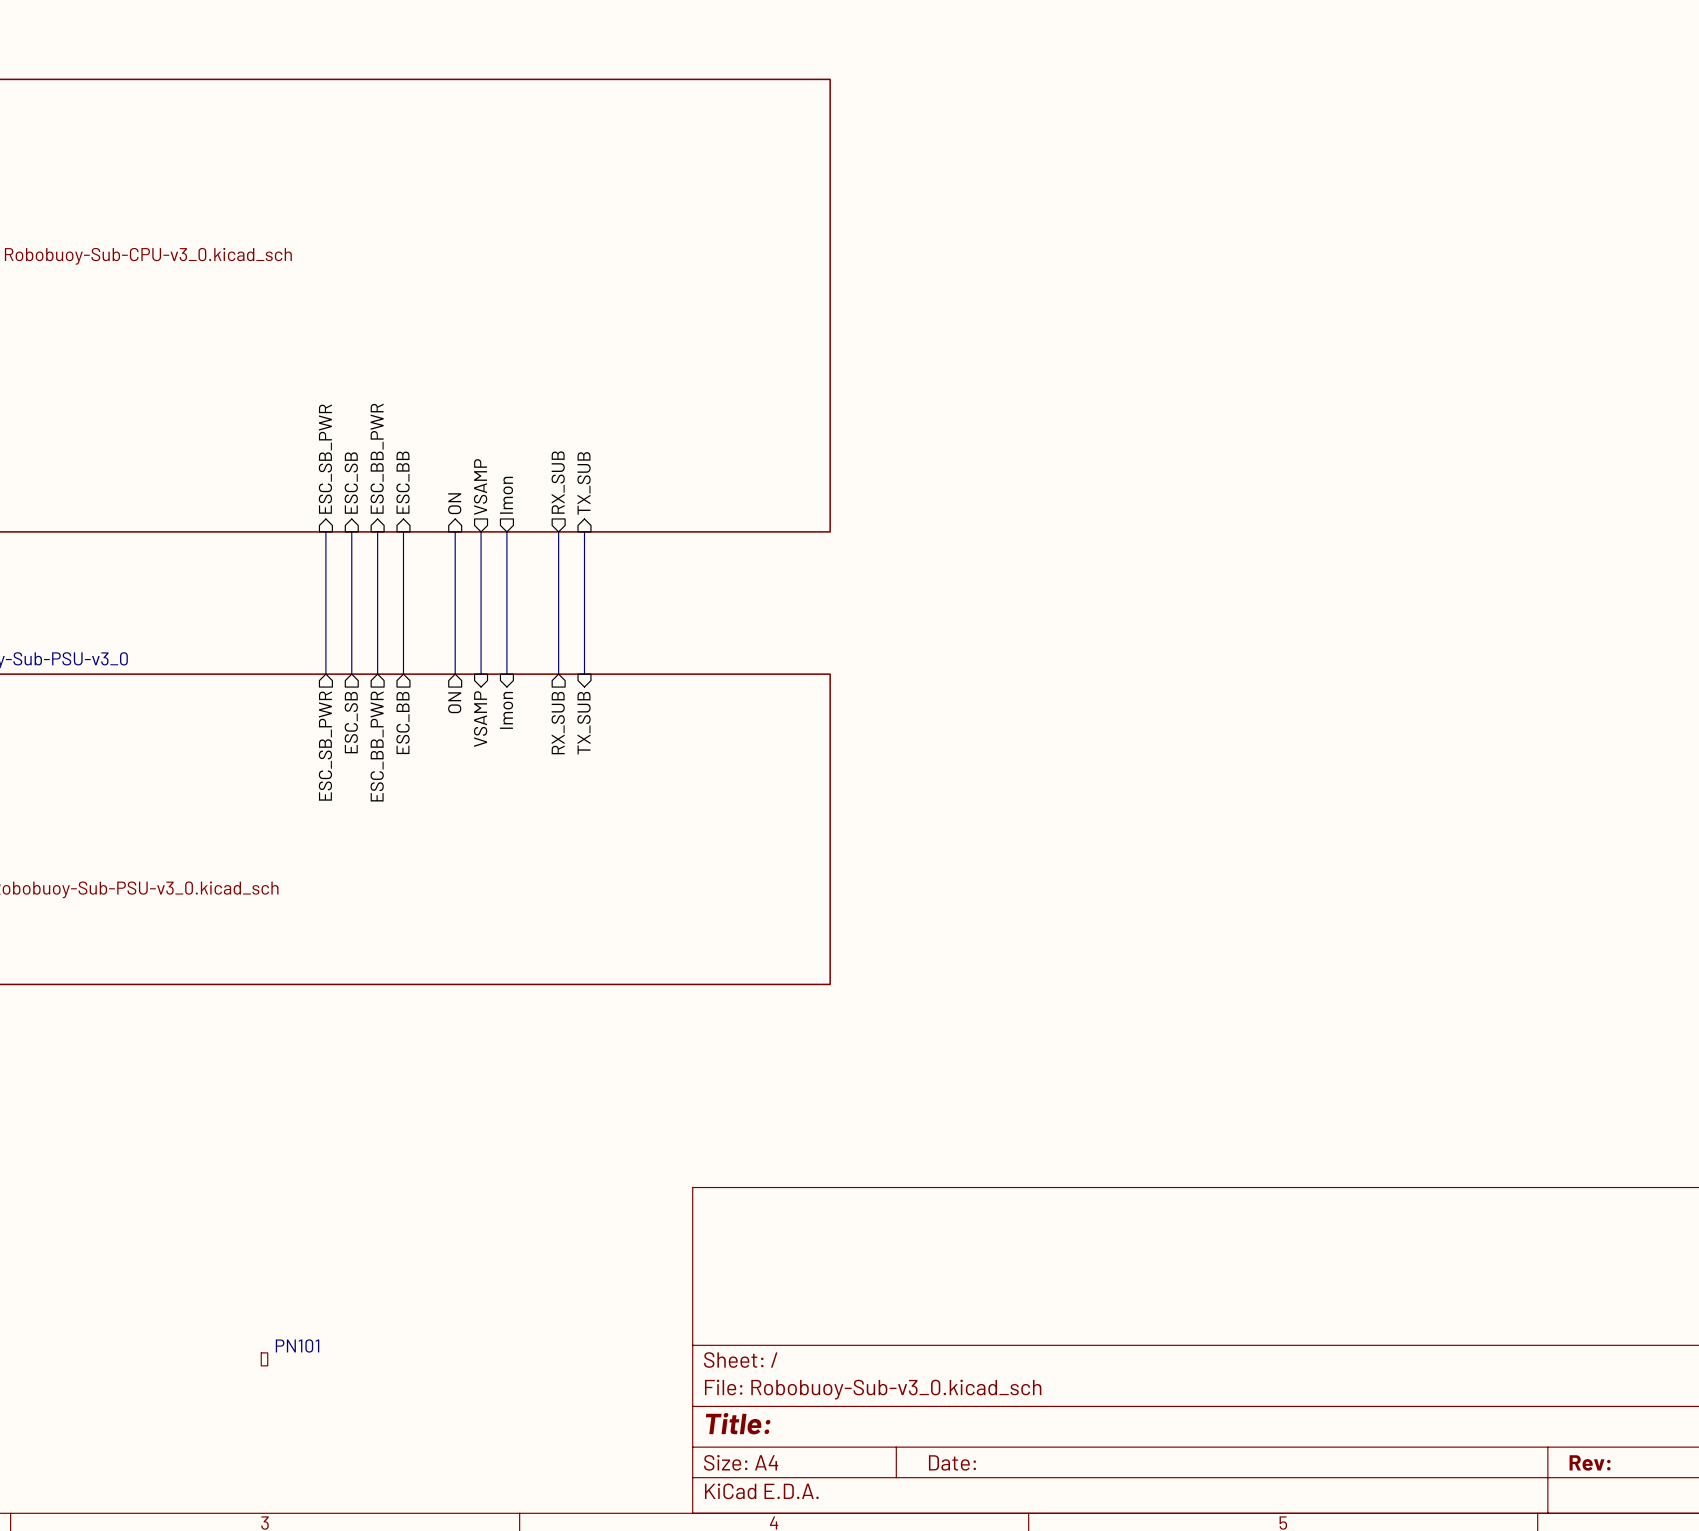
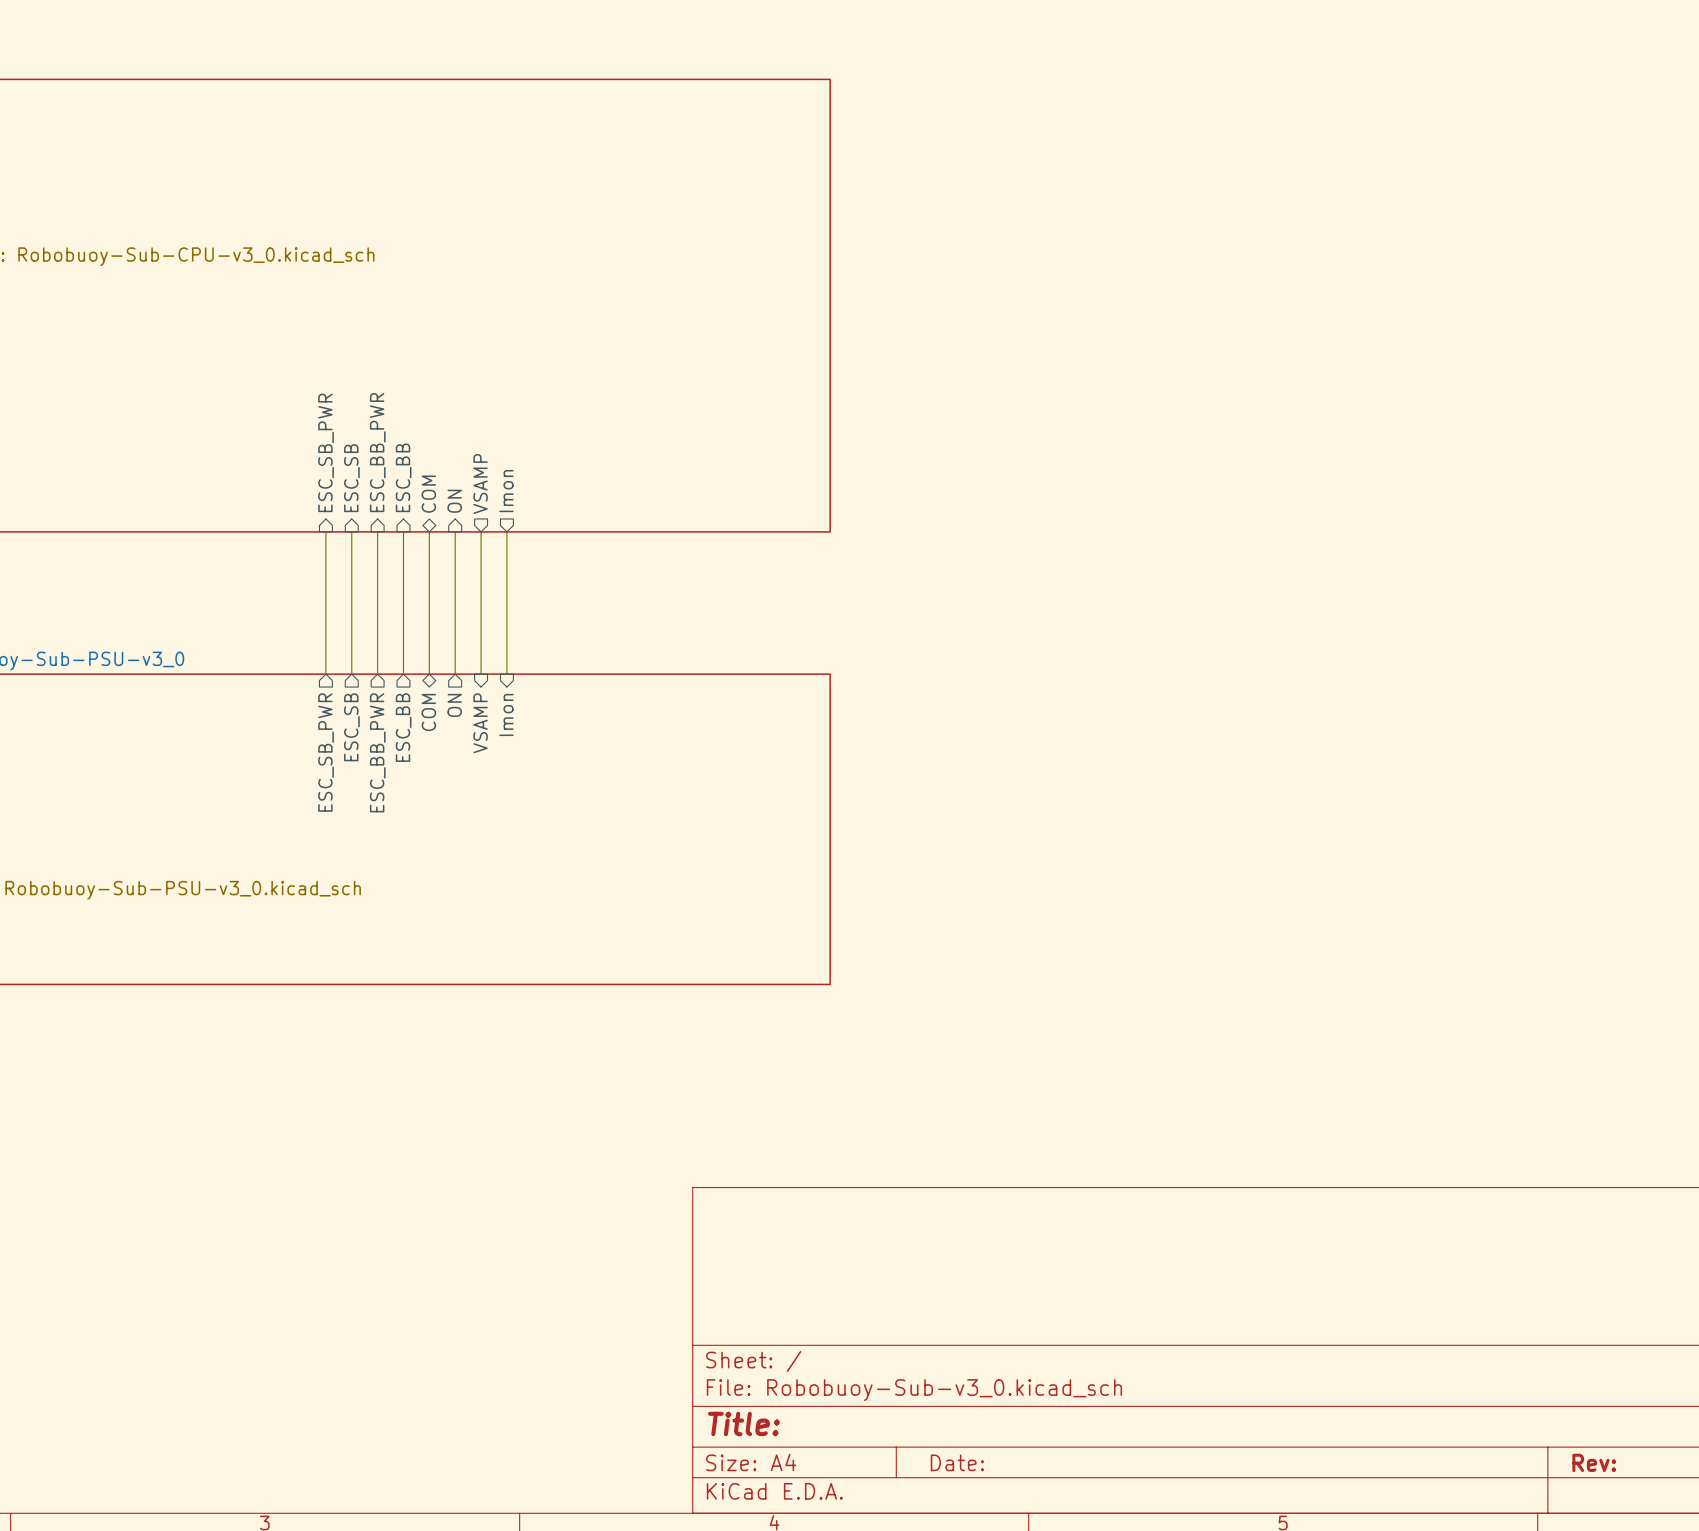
sheet pin: RX_SUB (558, 482) -> none
sheet pin: TX_SUB (584, 483) -> none
sheet pin: none -> COM (428, 494)
wire: (558, 531) (558, 674) -> (429, 531) (429, 674)
wire: (584, 531) (584, 674) -> none
sheet pin: none -> COM (428, 712)
sheet pin: RX_SUB (558, 723) -> none
sheet pin: TX_SUB (584, 723) -> none
PN101: (264, 1359) -> none

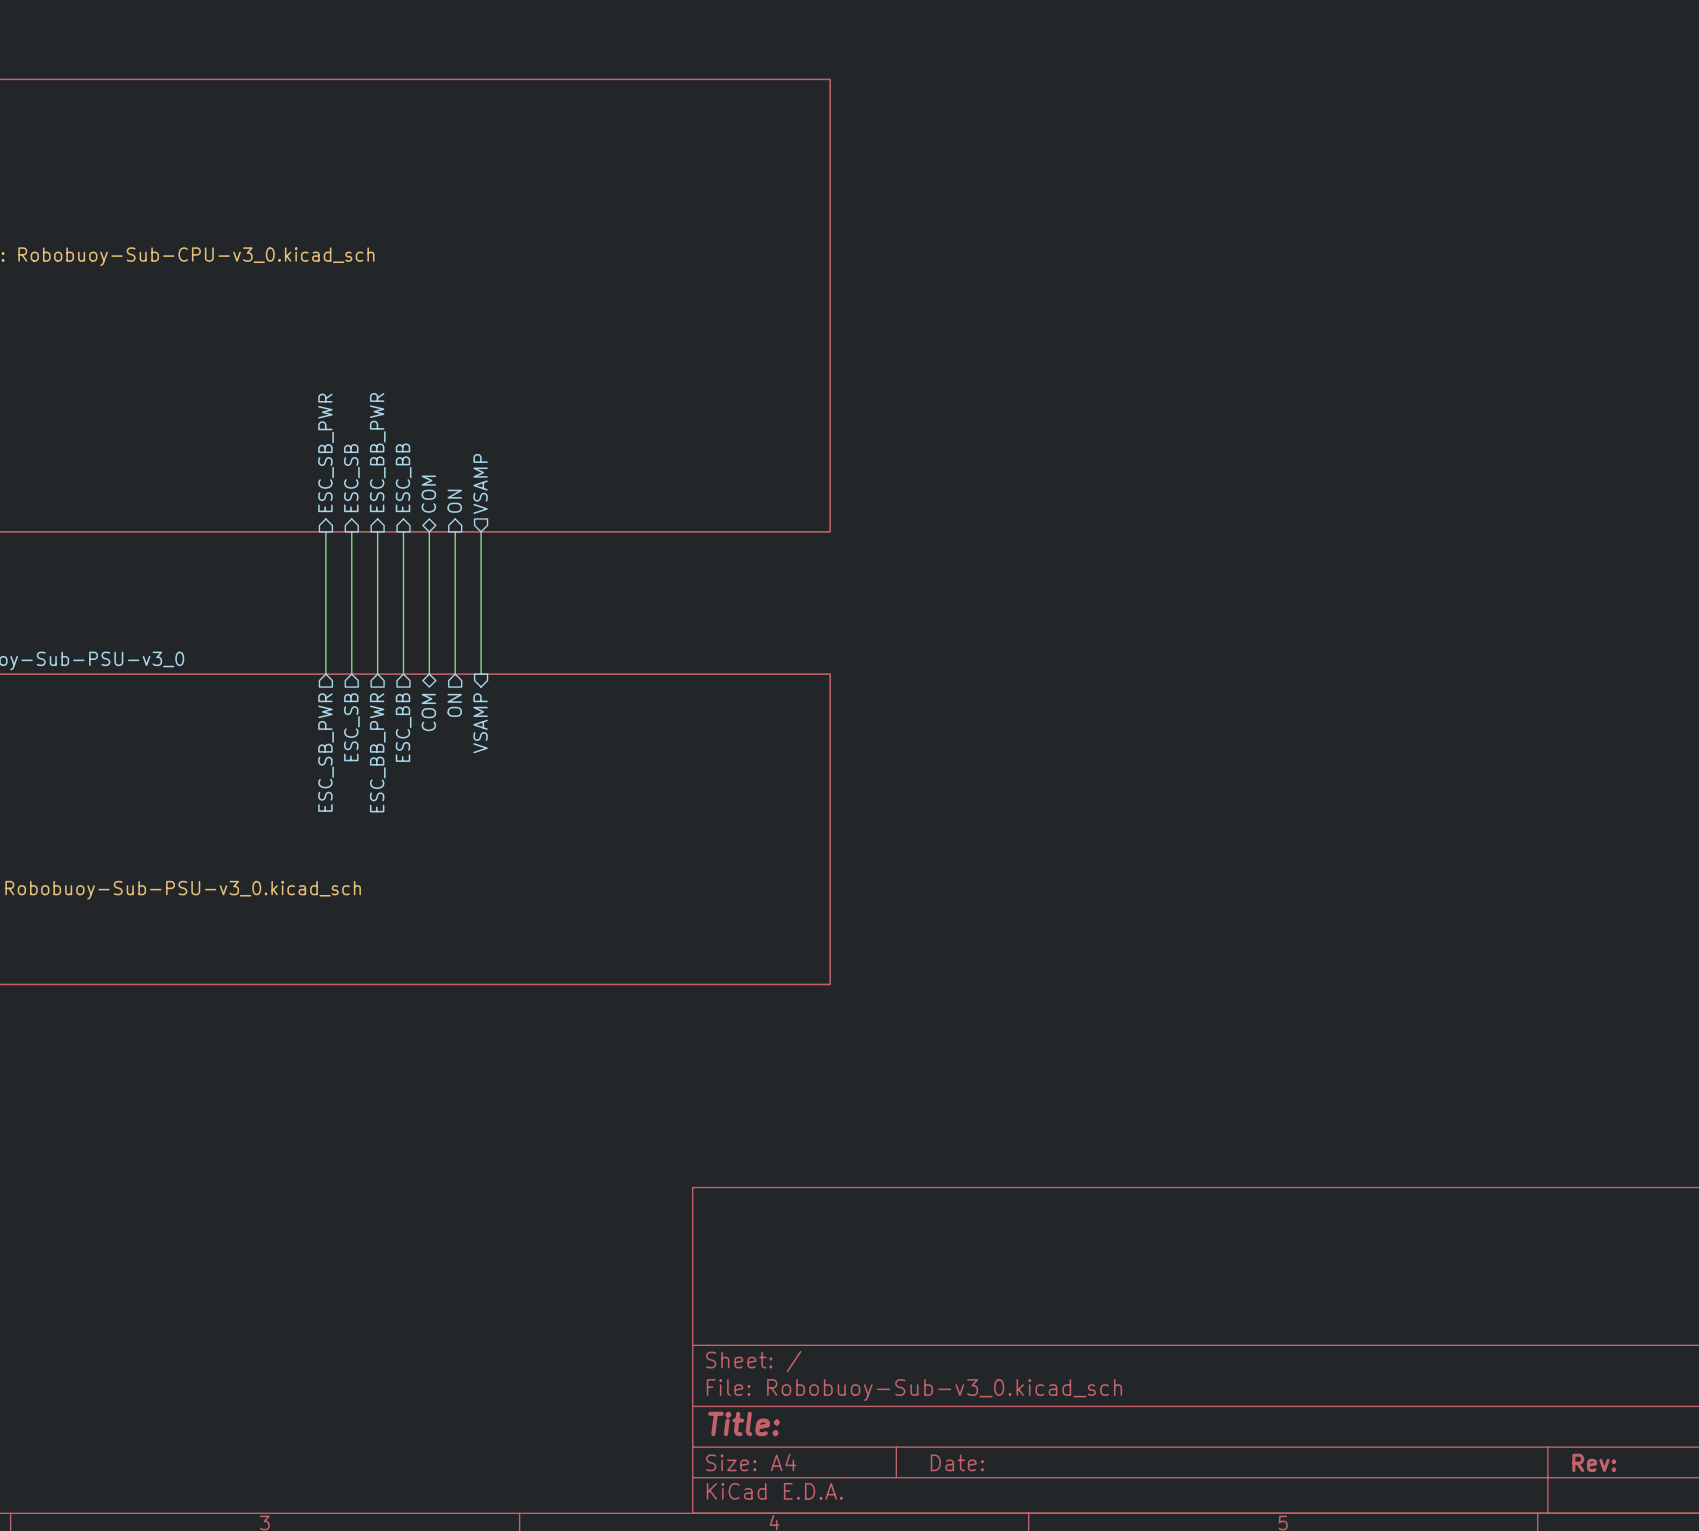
sheet pin: Imon (506, 491) -> none
wire: (506, 531) (506, 674) -> none
sheet pin: Imon (506, 714) -> none

